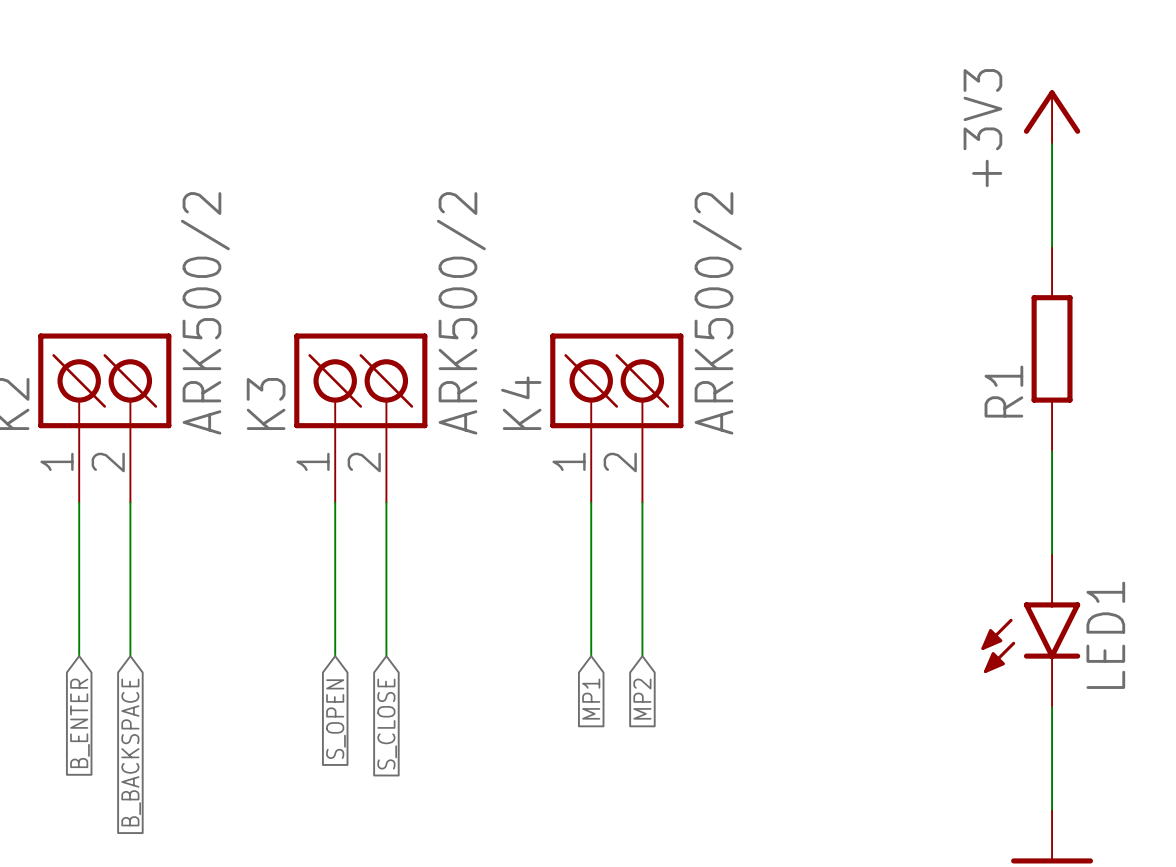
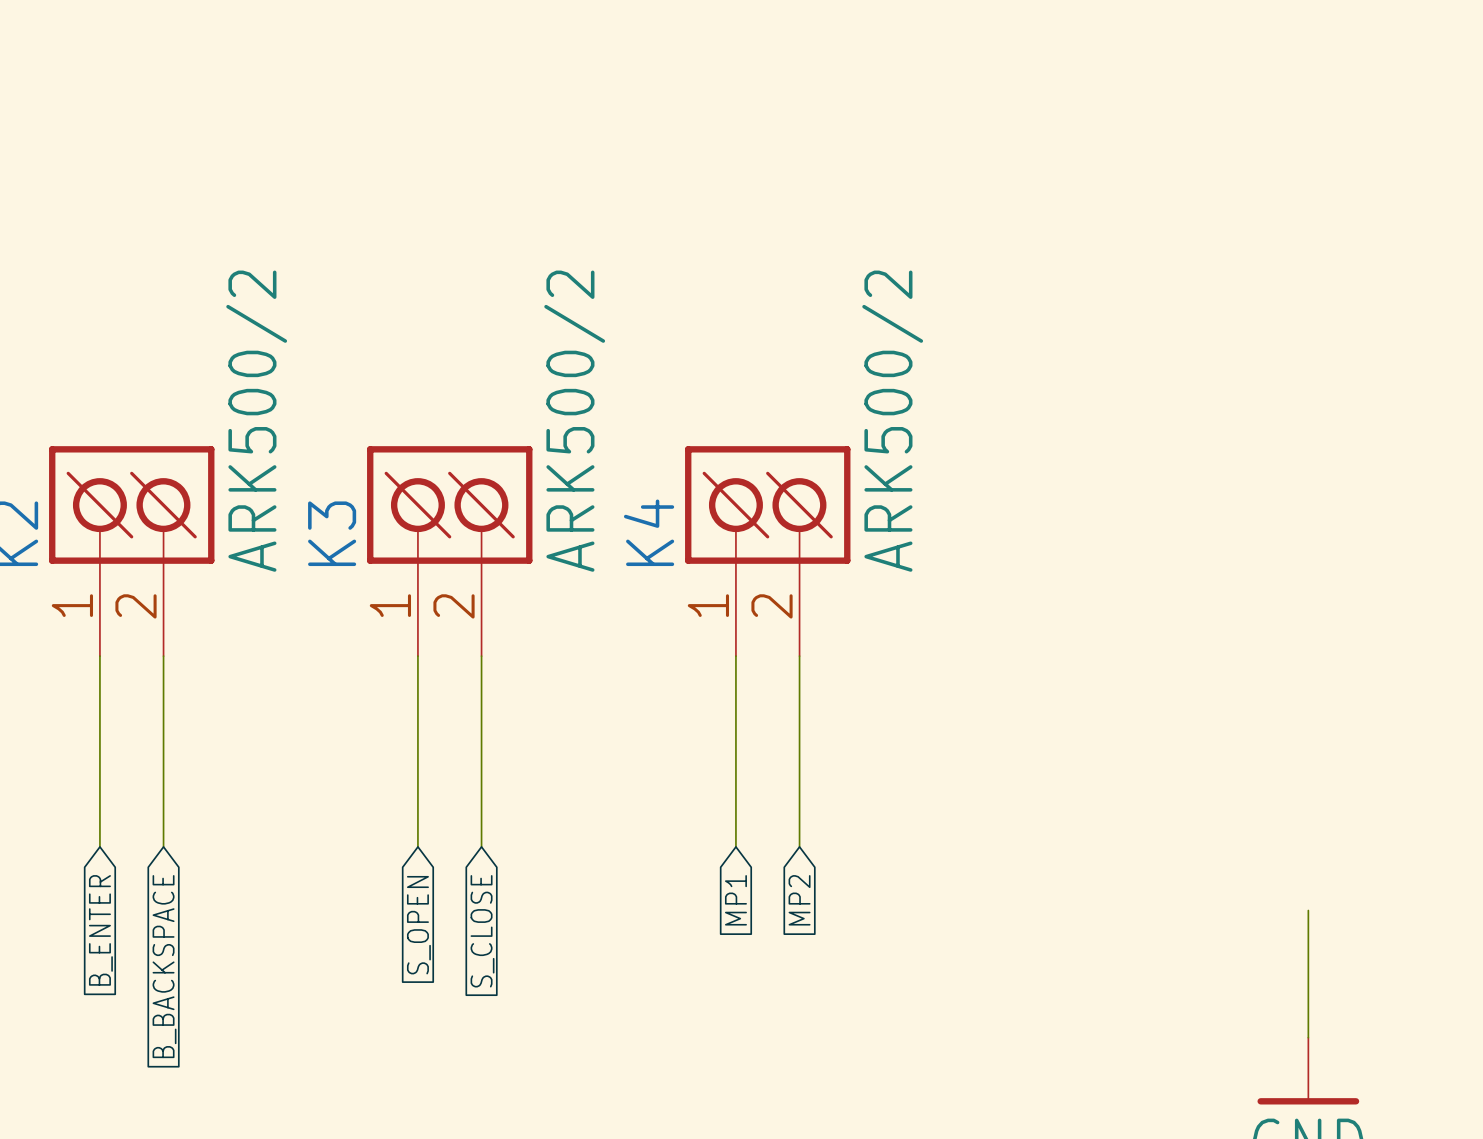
power symbol: +3V3 (1052, 117) -> none
wire: (1052, 144) (1052, 246) -> none
R1: (1052, 348) -> none
wire: (1052, 451) (1052, 553) -> none
LED1: (1030, 630) -> none

